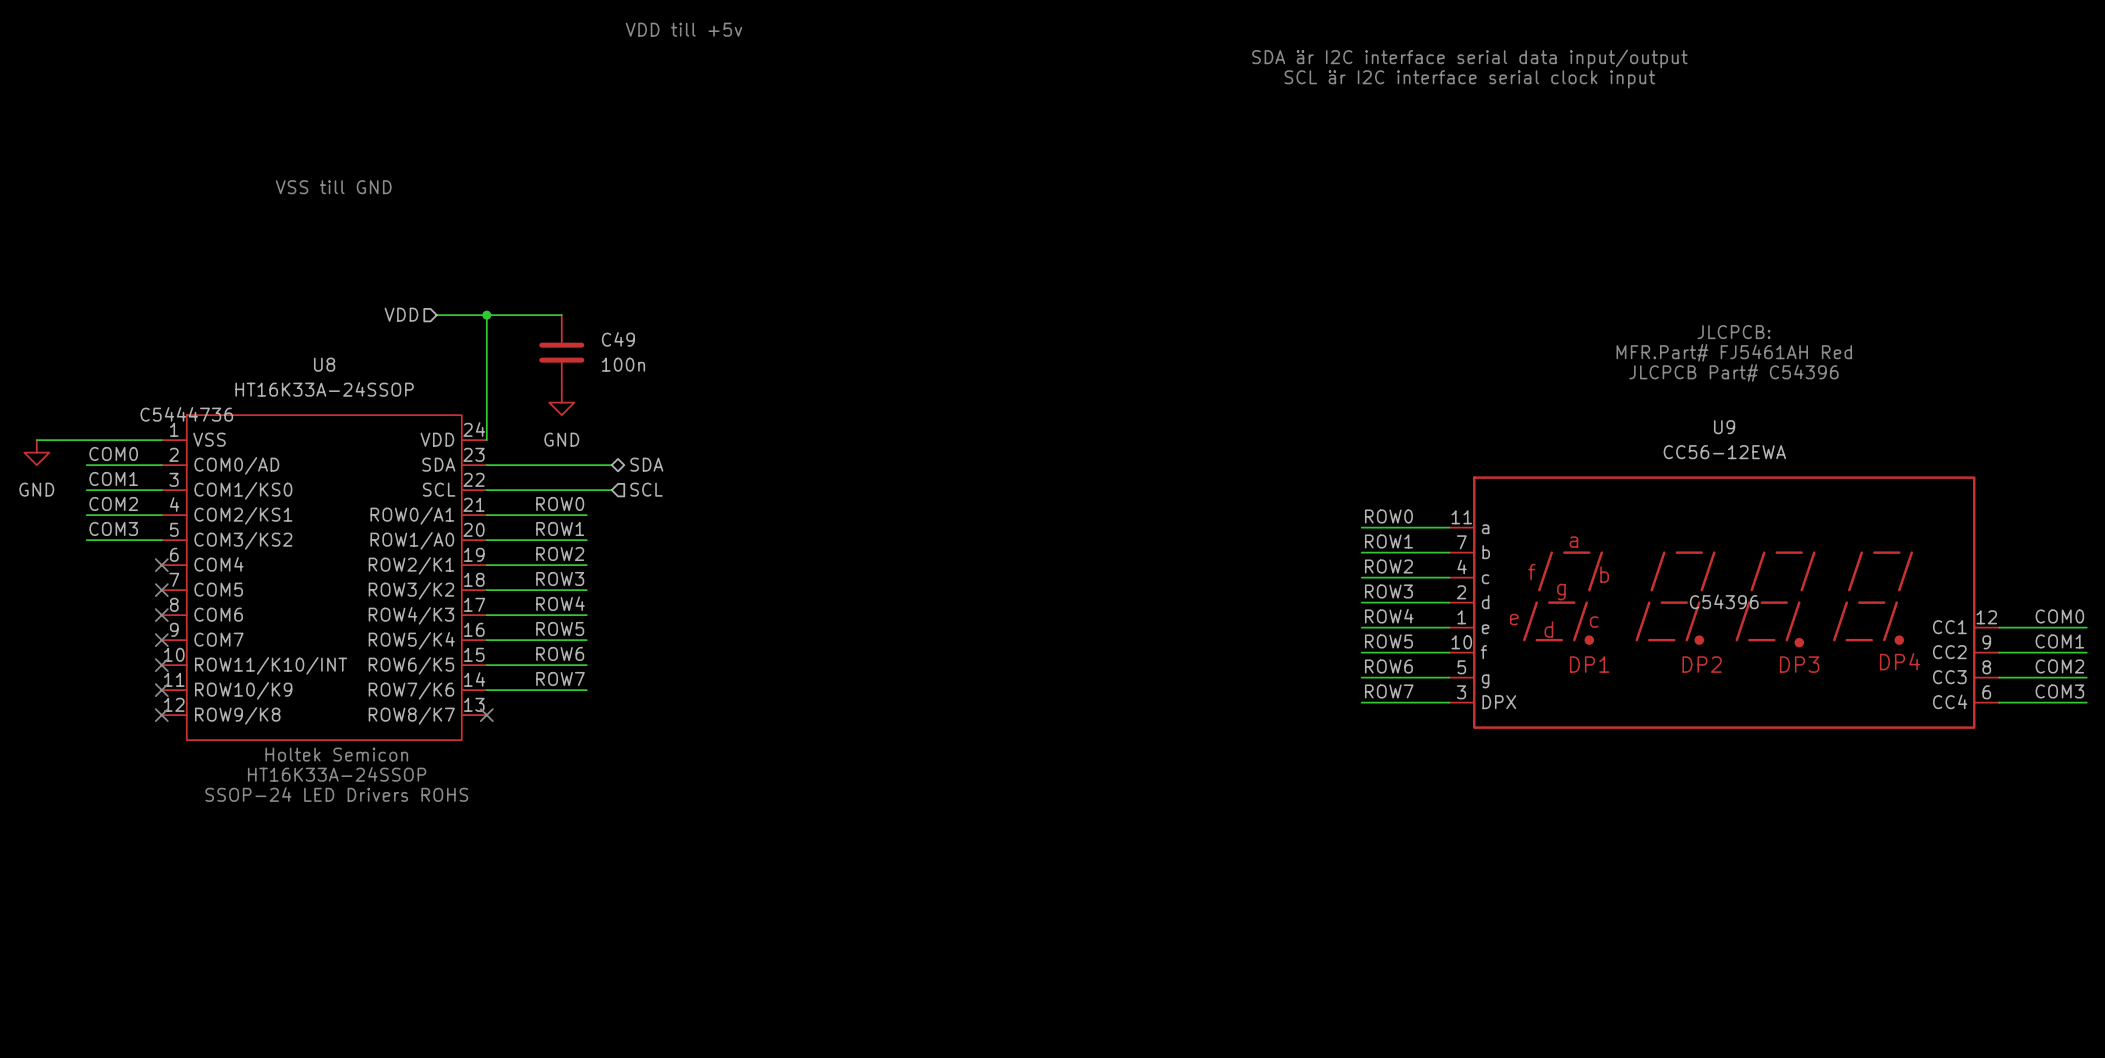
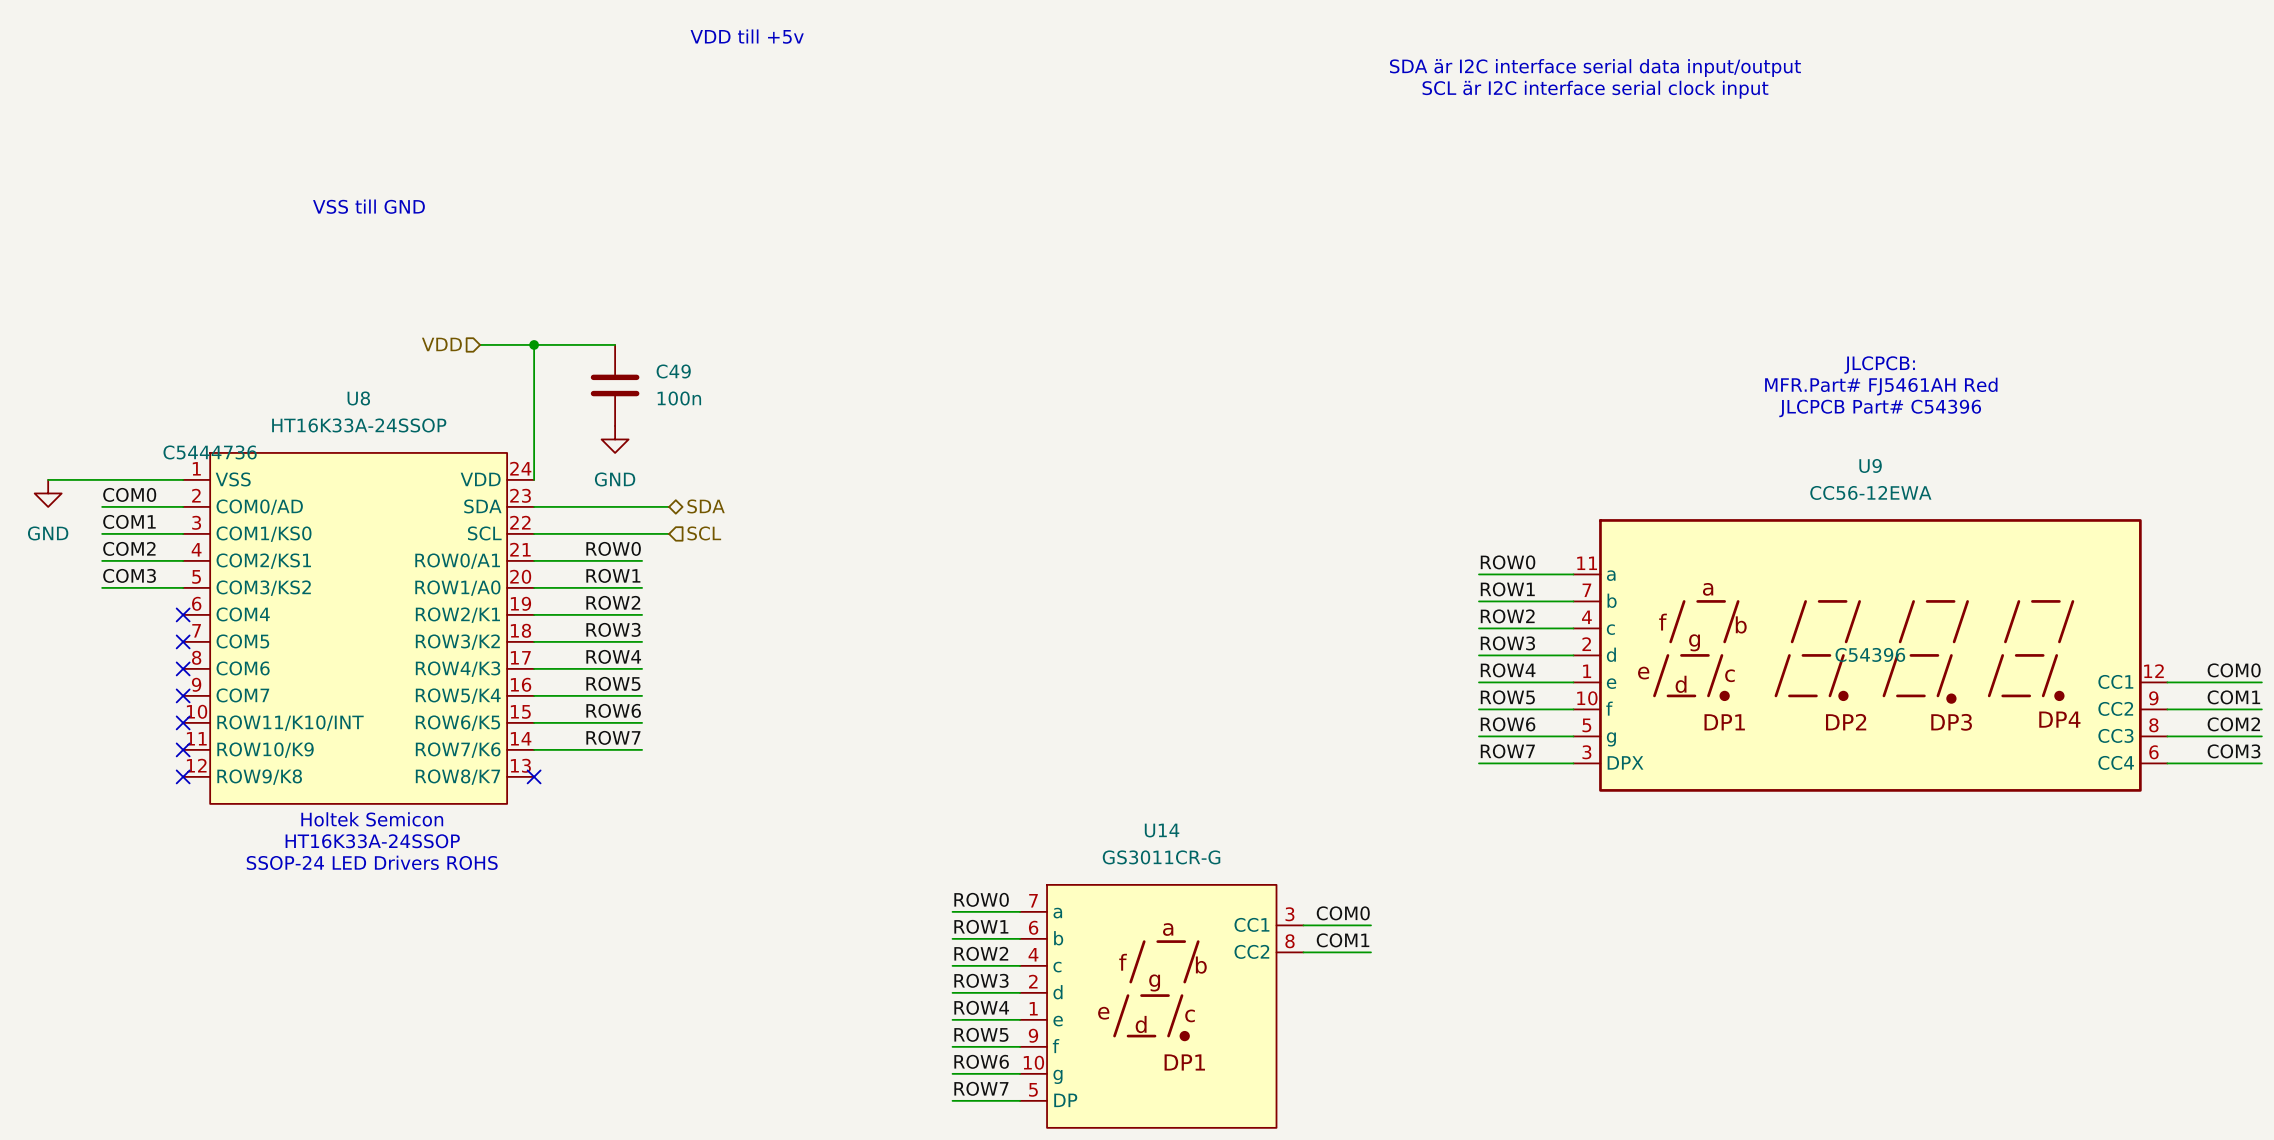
label: none -> ROW0 (981, 899)
wire: none -> (952, 911) (1020, 911)
label: none -> COM0 (1343, 913)
wire: none -> (1303, 925) (1370, 925)
label: none -> ROW1 (981, 926)
wire: none -> (952, 938) (1020, 938)
label: none -> COM1 (1343, 940)
wire: none -> (1303, 952) (1370, 952)
label: none -> ROW2 (981, 953)
wire: none -> (952, 965) (1020, 965)
label: none -> ROW3 (981, 980)
wire: none -> (952, 992) (1020, 992)
U14: none -> GS3011CR-G (1161, 1006)
label: none -> ROW4 (981, 1007)
wire: none -> (952, 1019) (1020, 1019)
label: none -> ROW5 (981, 1034)
wire: none -> (952, 1046) (1020, 1046)
label: none -> ROW6 (981, 1061)
wire: none -> (952, 1073) (1020, 1073)
label: none -> ROW7 (981, 1088)
wire: none -> (952, 1100) (1020, 1100)

